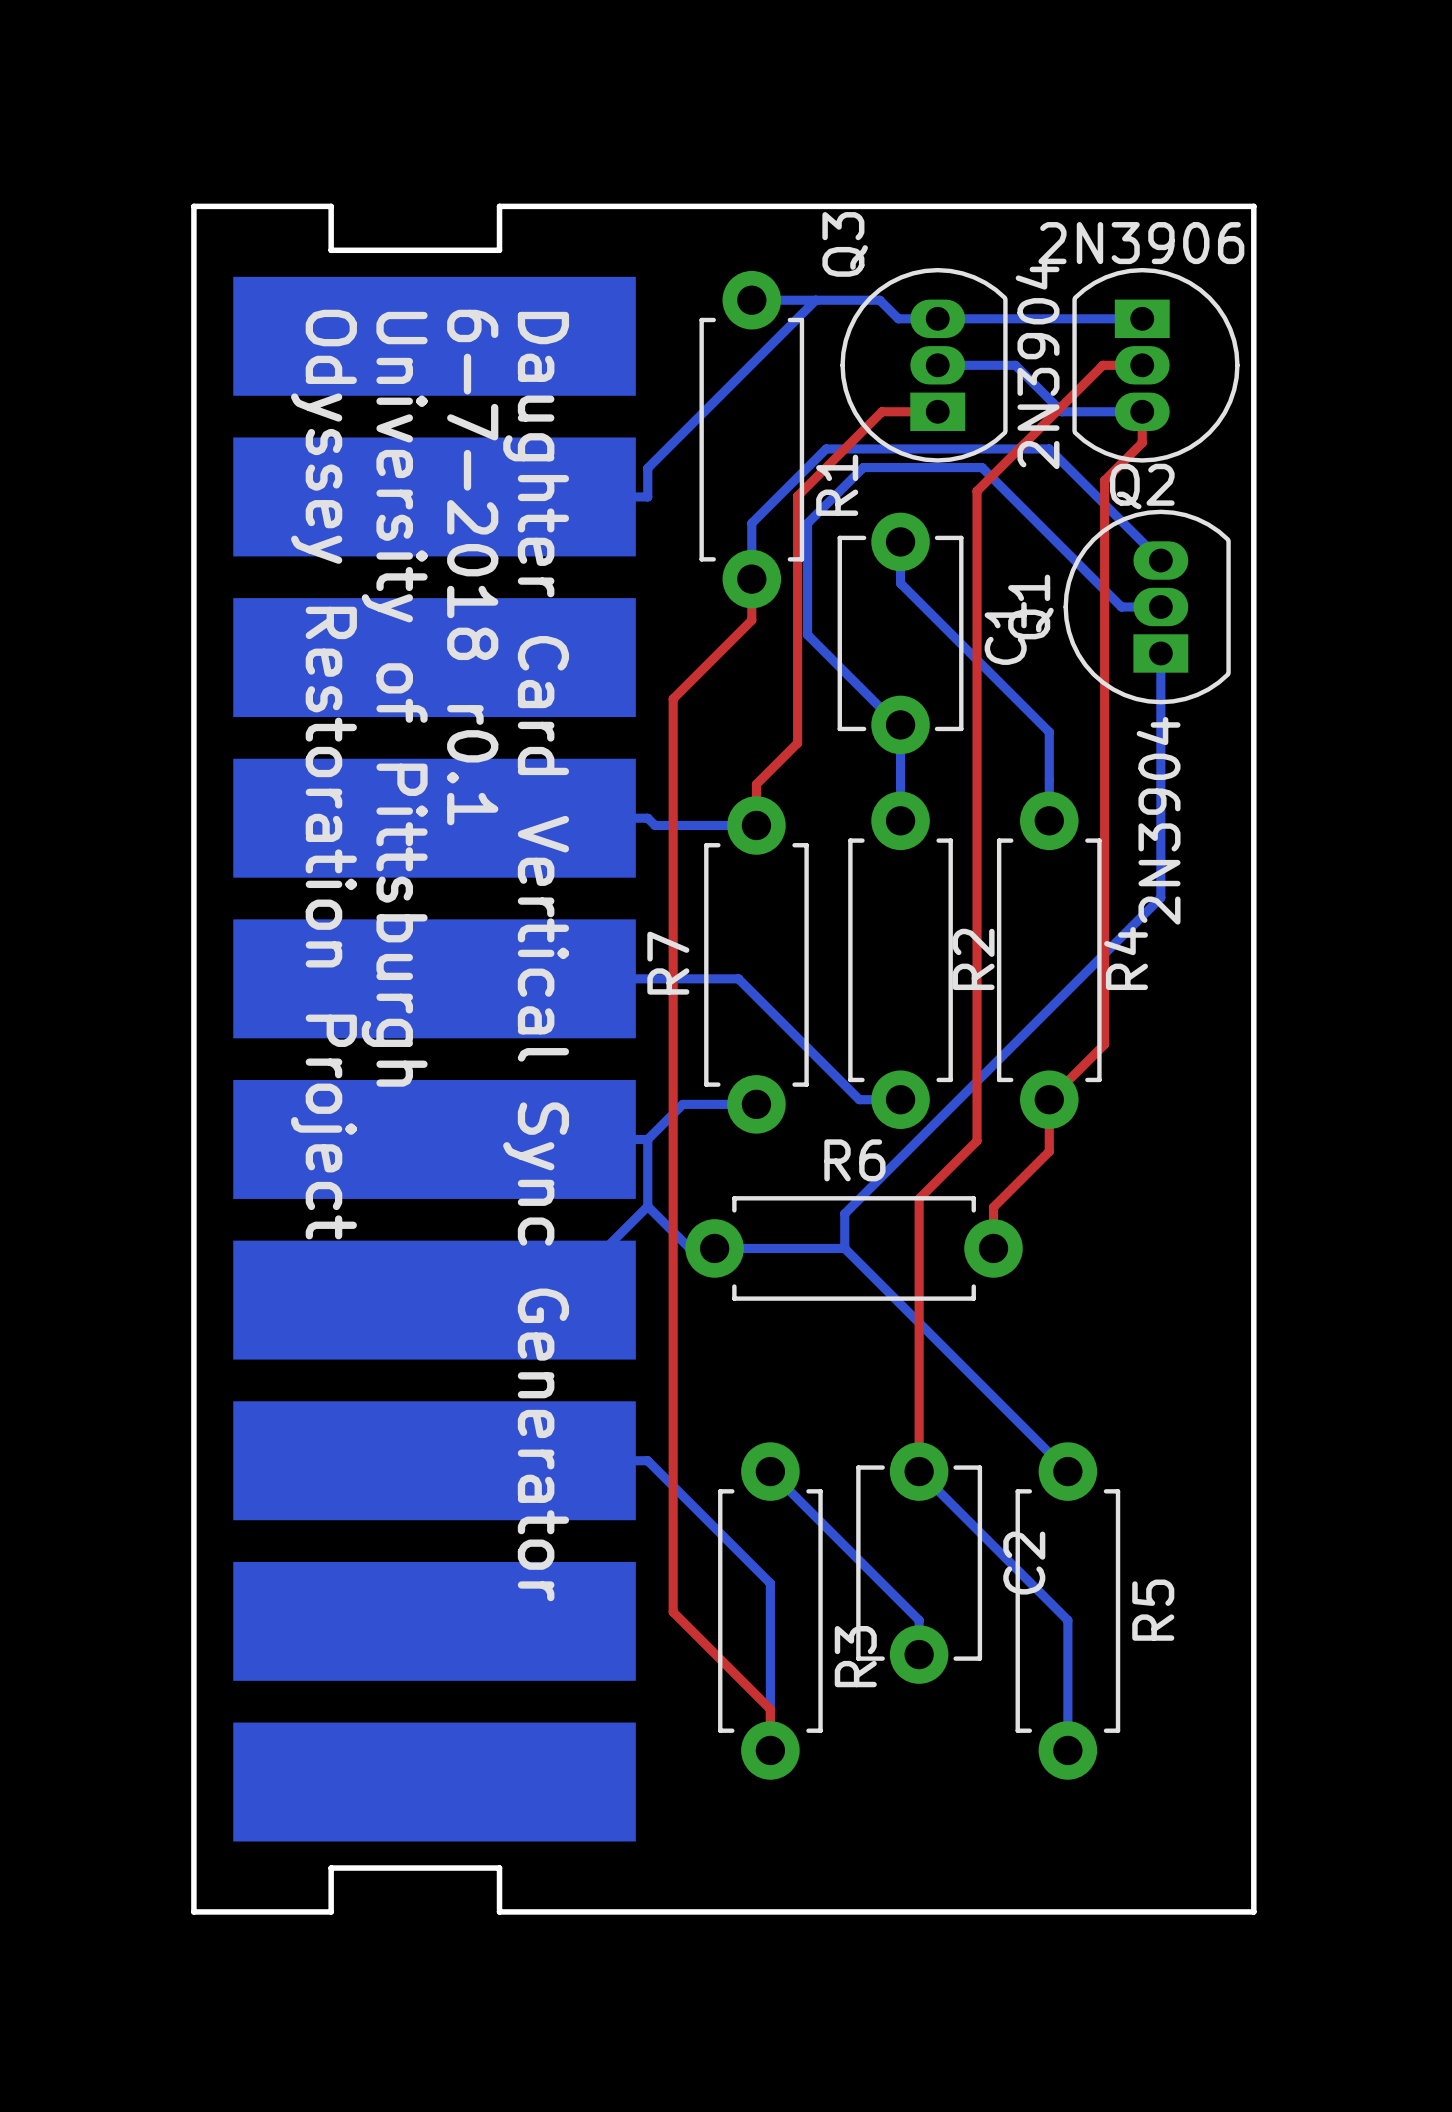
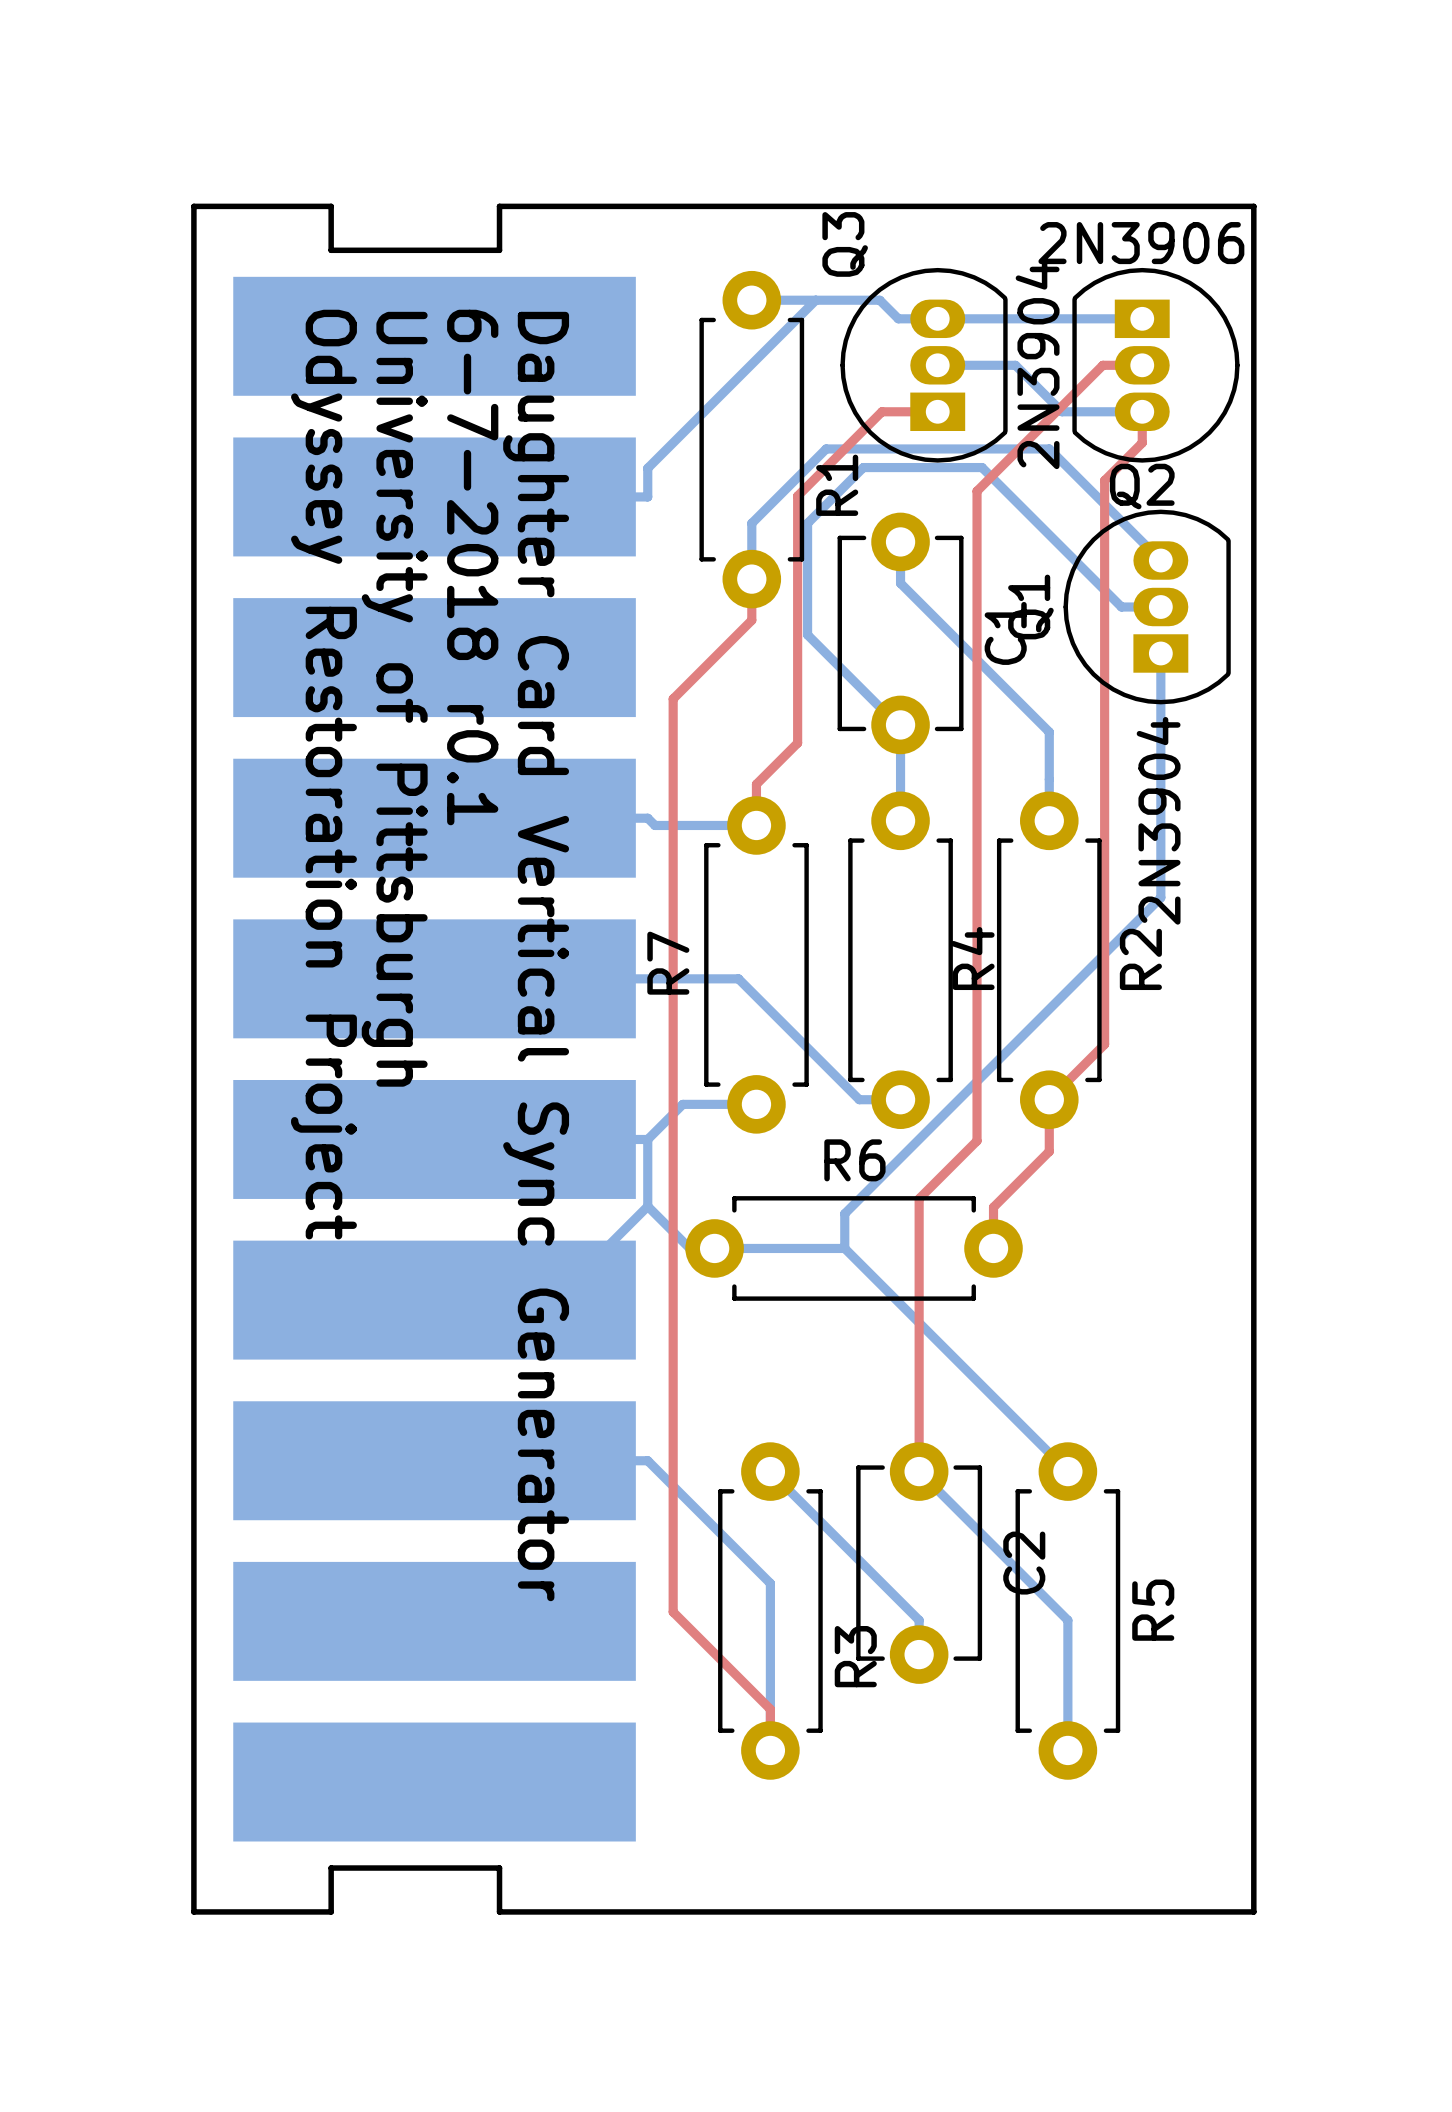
R4 name position: R4 (1126, 958) -> R4 (972, 958)
R2 name position: R2 (973, 959) -> R2 (1140, 959)

